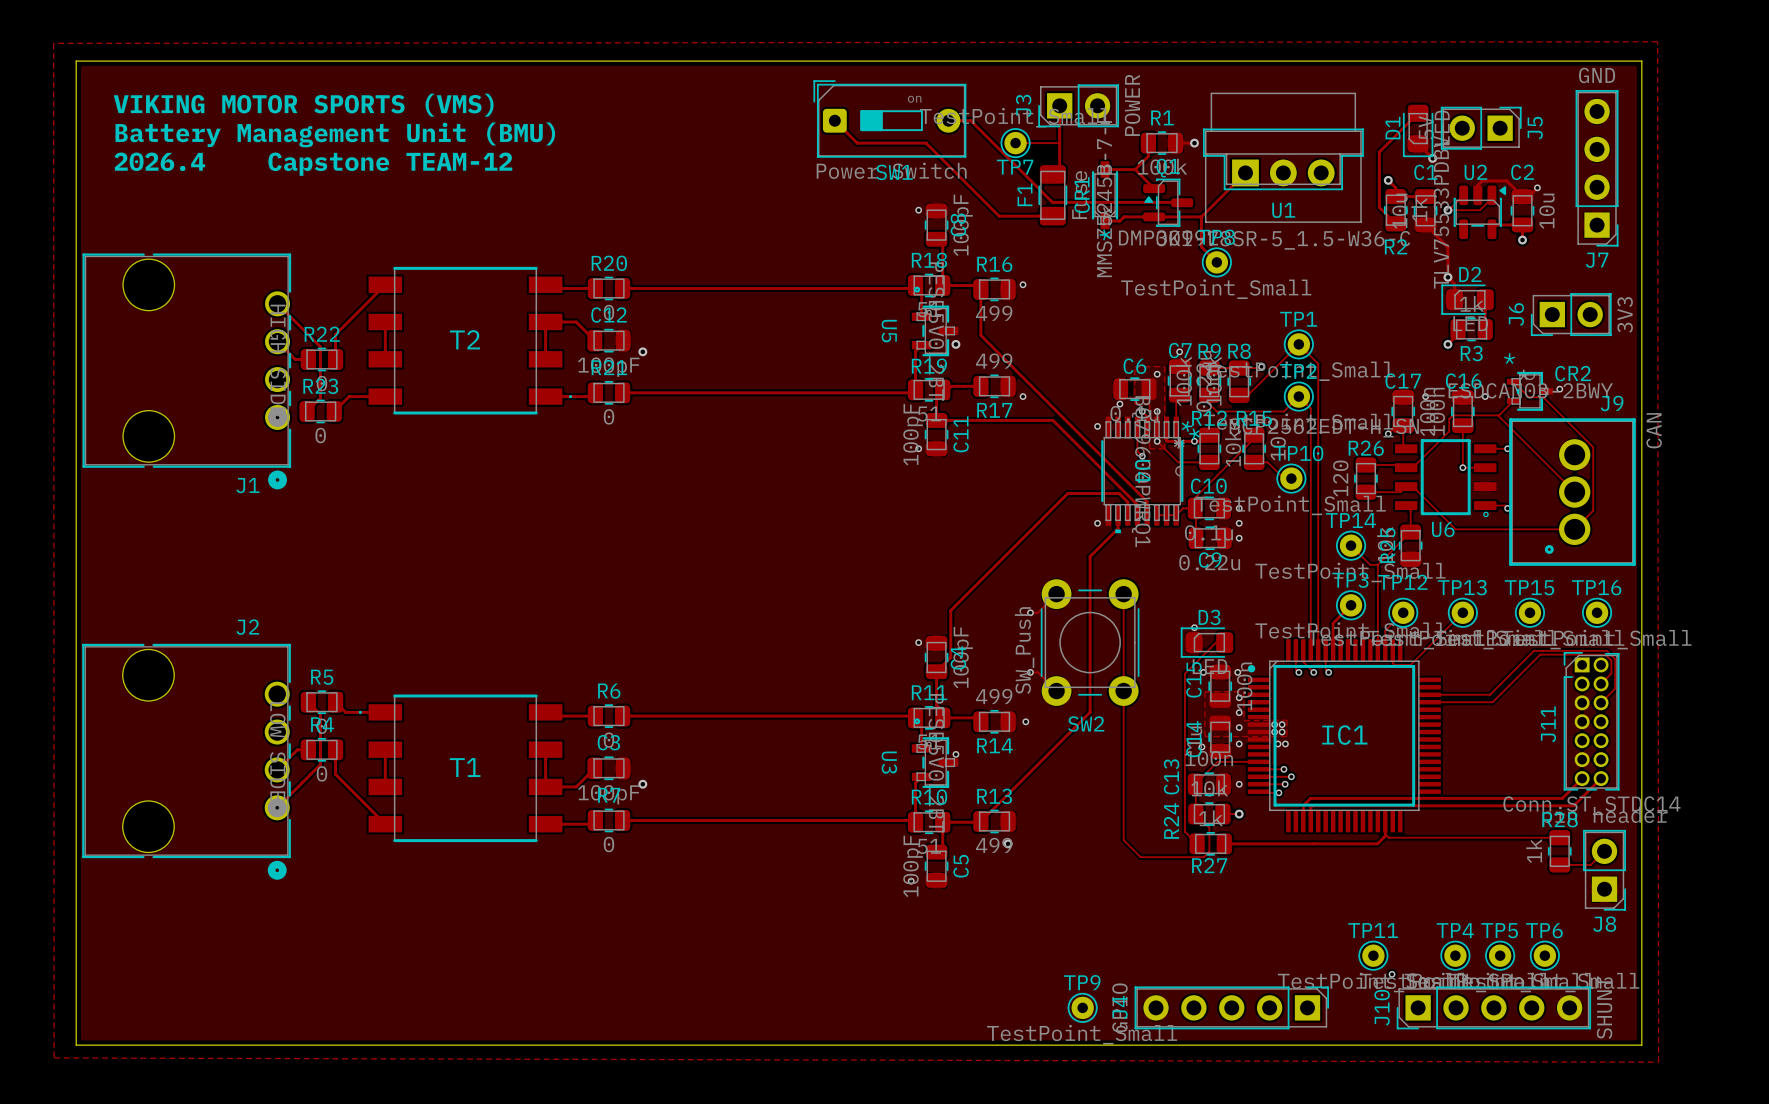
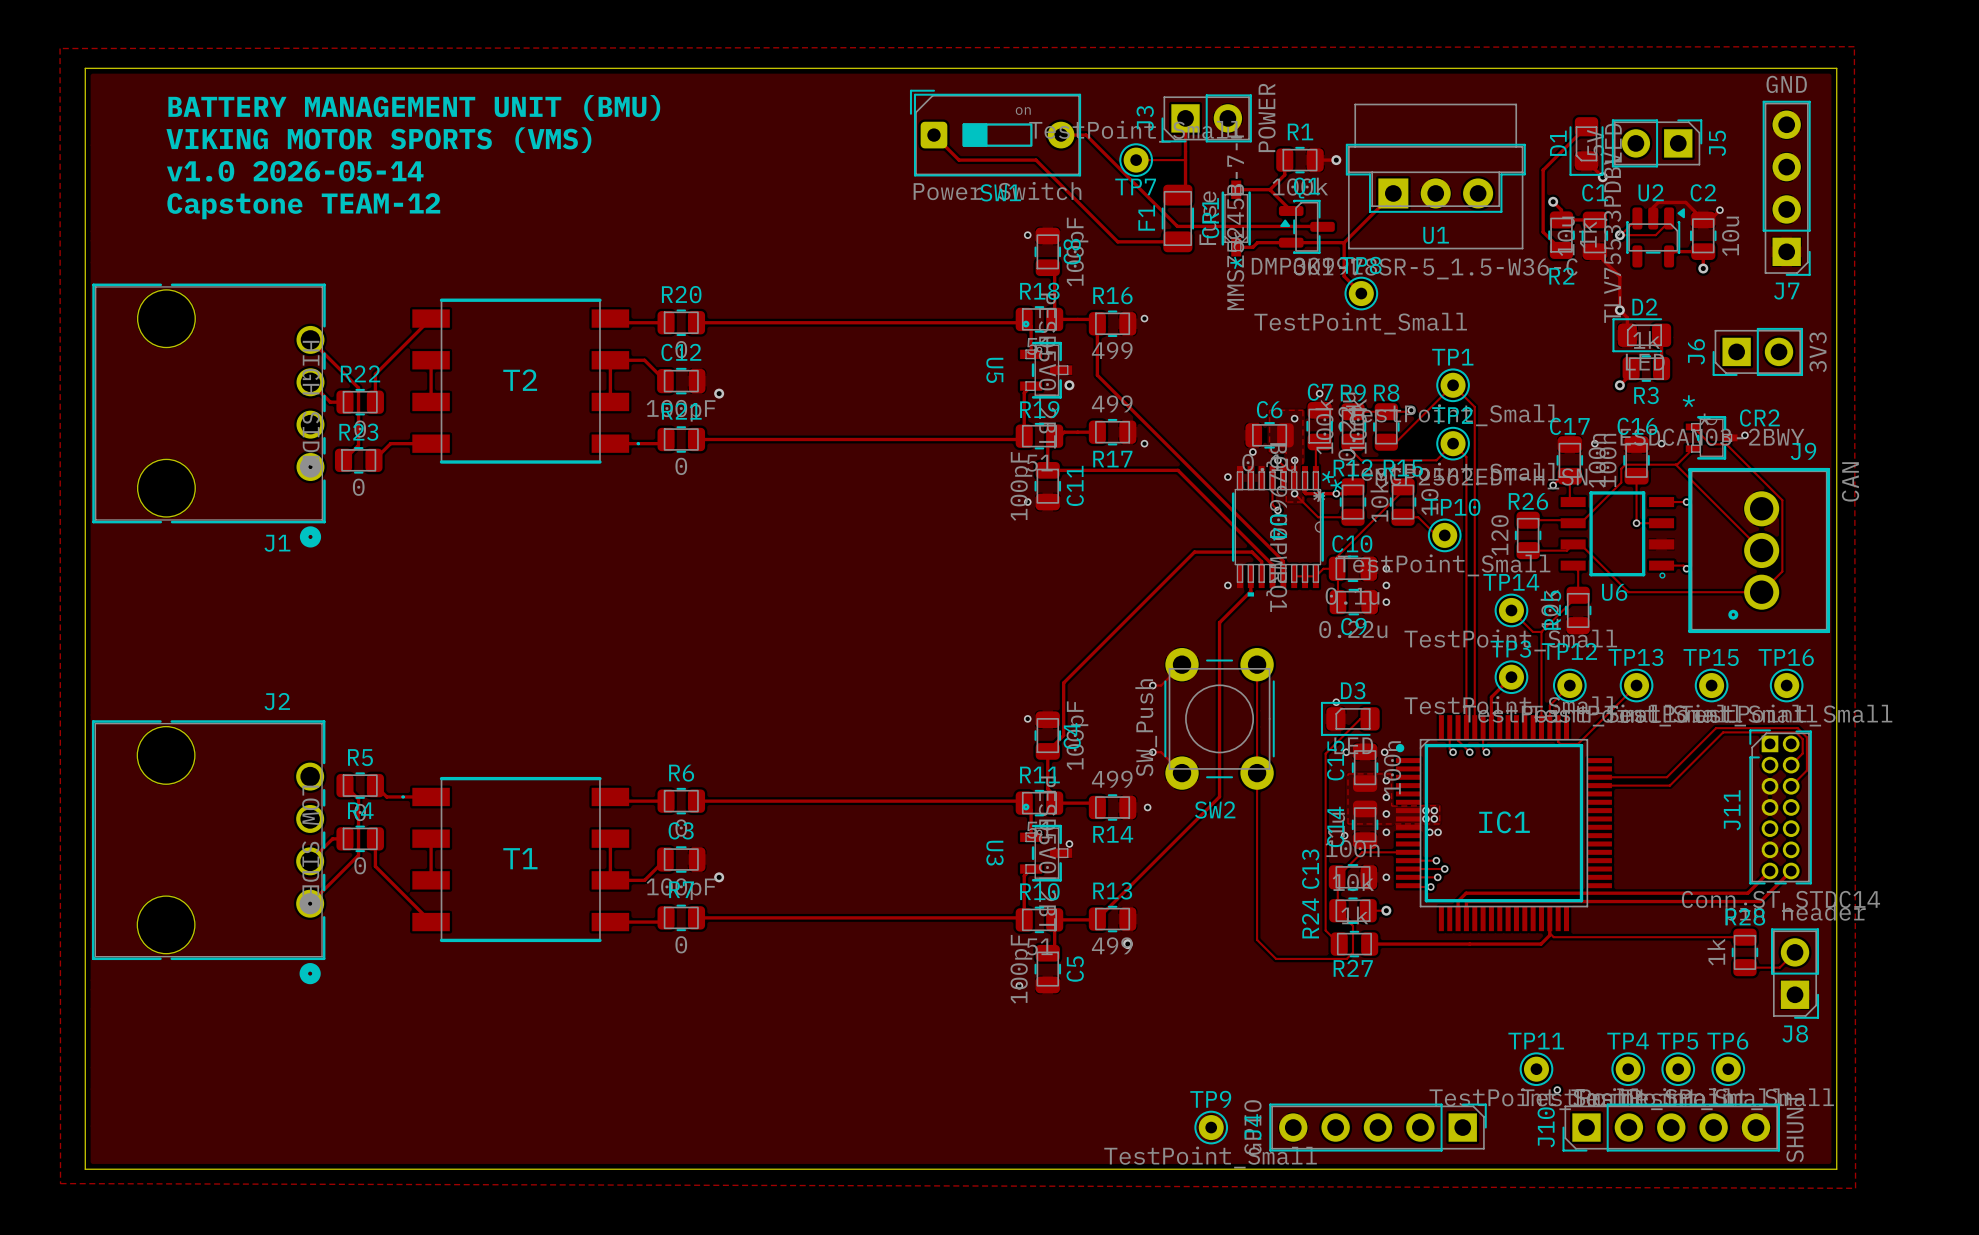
text: none -> BATTERY MANAGEMENT UNIT (BMU) (414, 107)
text position: VIKING MOTOR SPORTS (VMS) (303, 105) -> VIKING MOTOR SPORTS (VMS) (378, 140)
text: Battery Management Unit (BMU) (335, 134) -> none
text: none -> v1.0 2026-05-14 (295, 171)
text: 2026.4 Capstone TEAM-12 (313, 164) -> Capstone TEAM-12 (303, 206)

